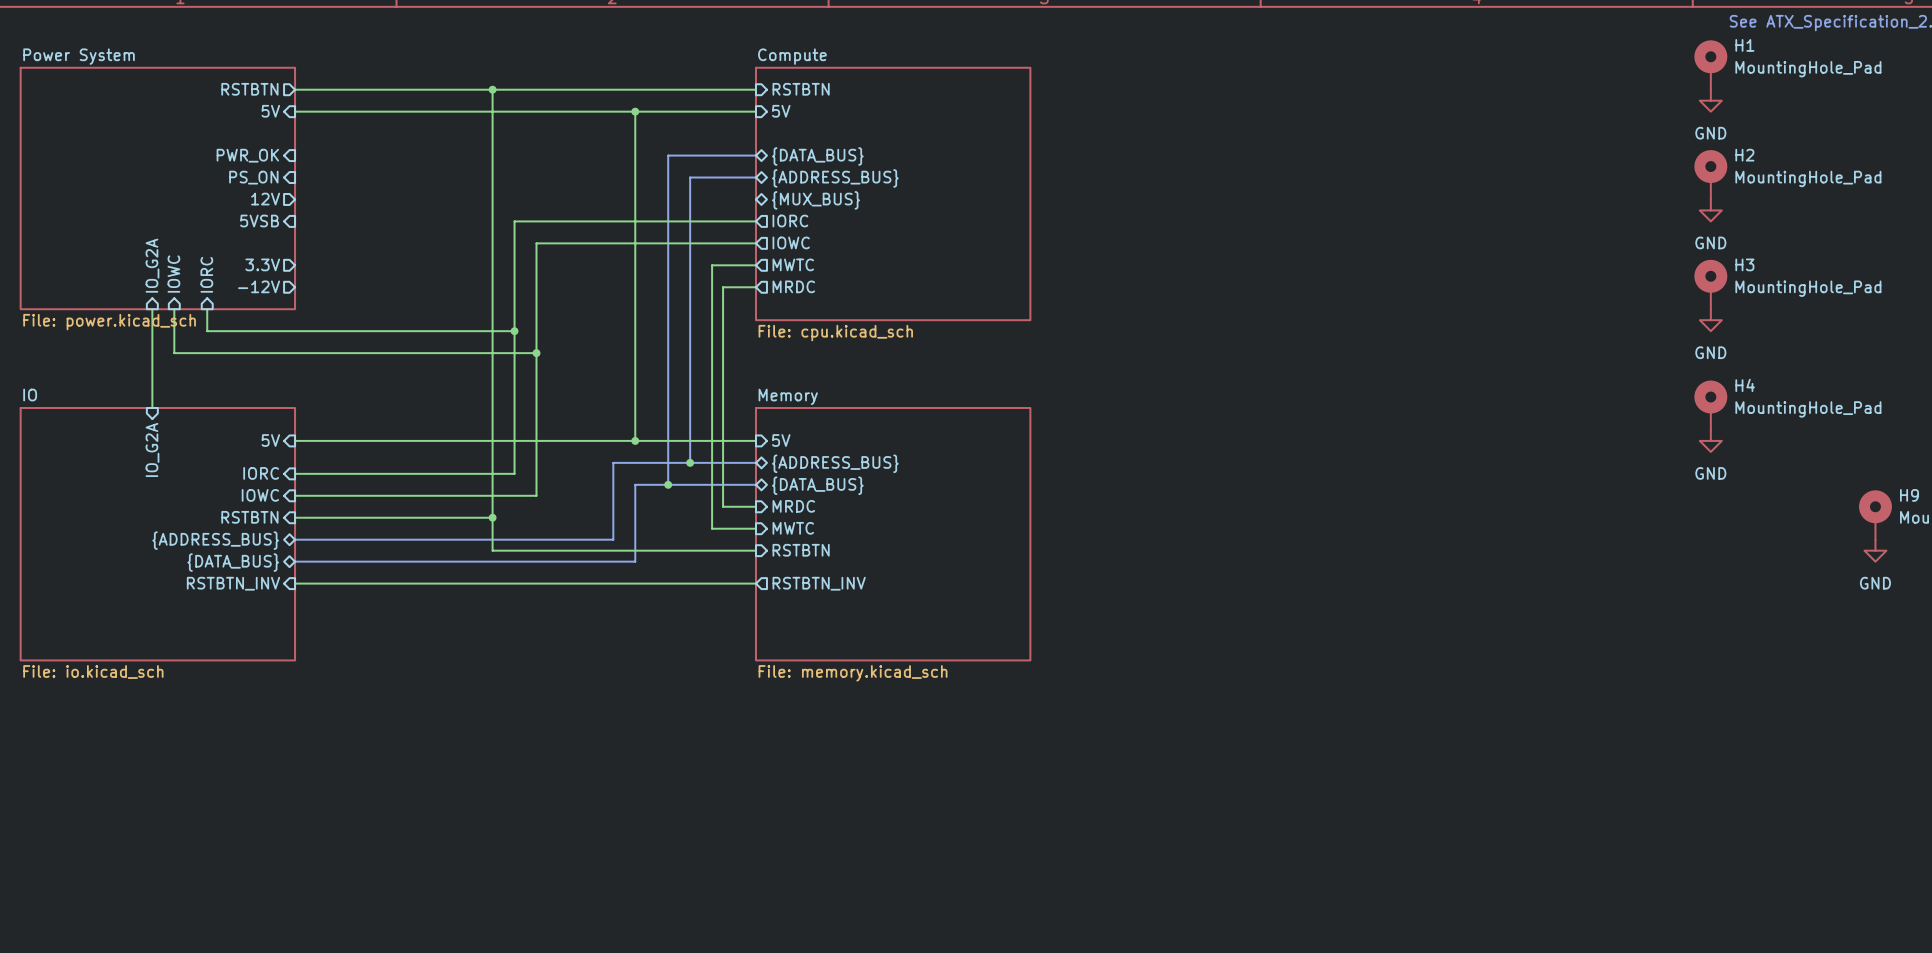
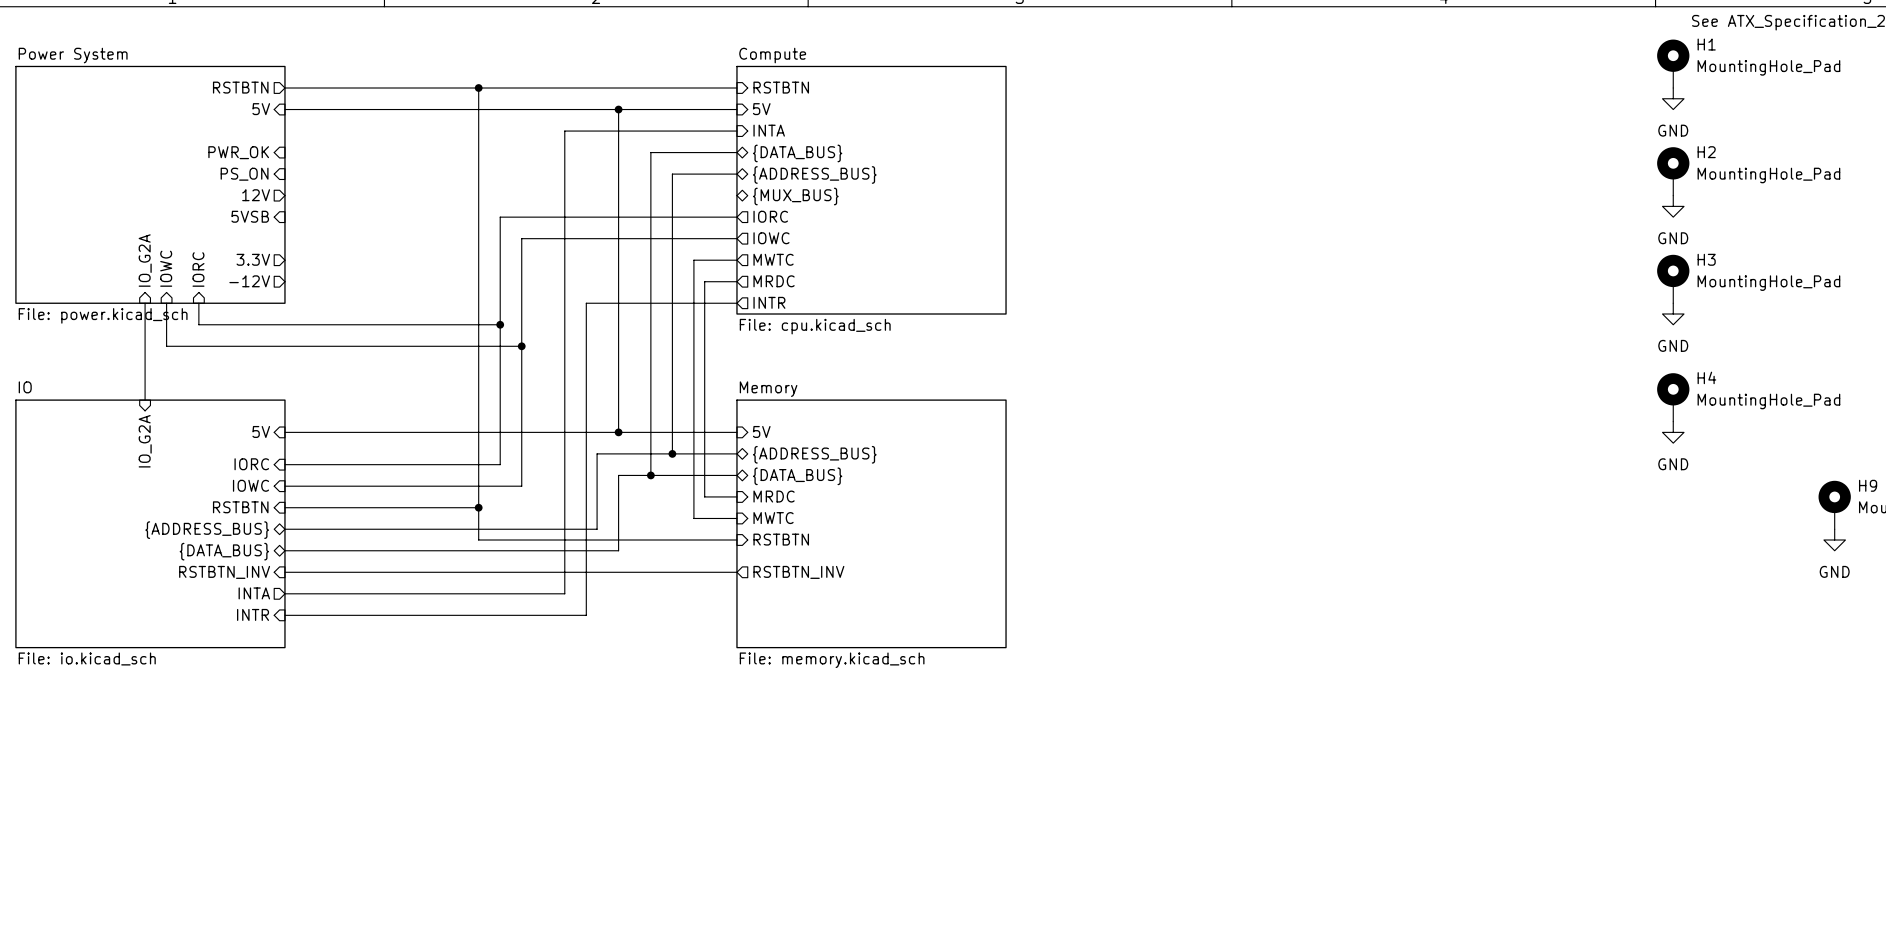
wire: none -> (736, 131) (564, 131) (564, 593) (284, 593)
sheet pin: none -> INTA (769, 130)
sheet pin: none -> INTR (769, 302)
wire: none -> (736, 303) (586, 303) (586, 615) (284, 615)
sheet pin: none -> INTA (254, 593)
sheet pin: none -> INTR (253, 614)

